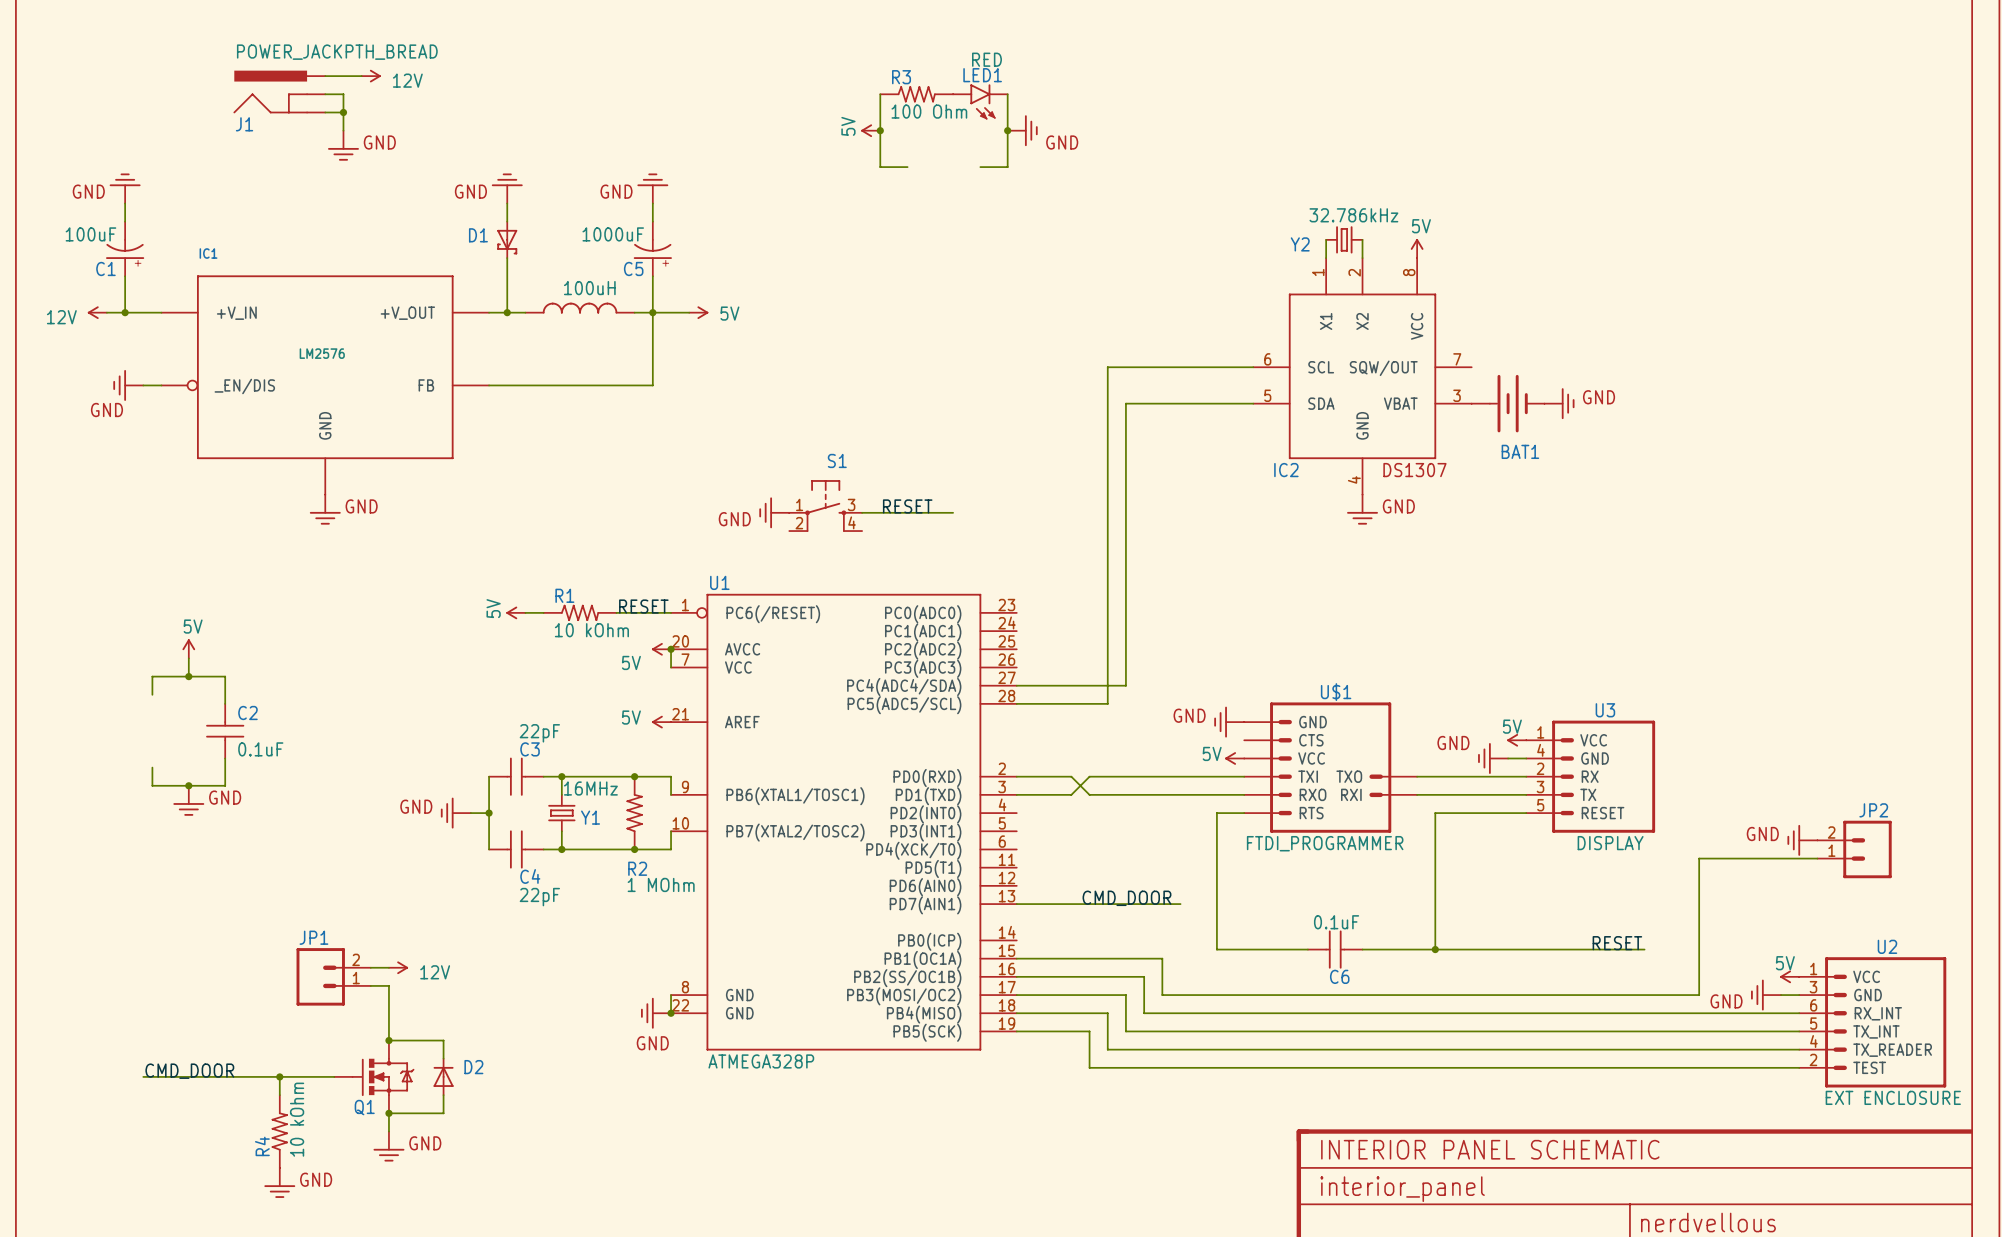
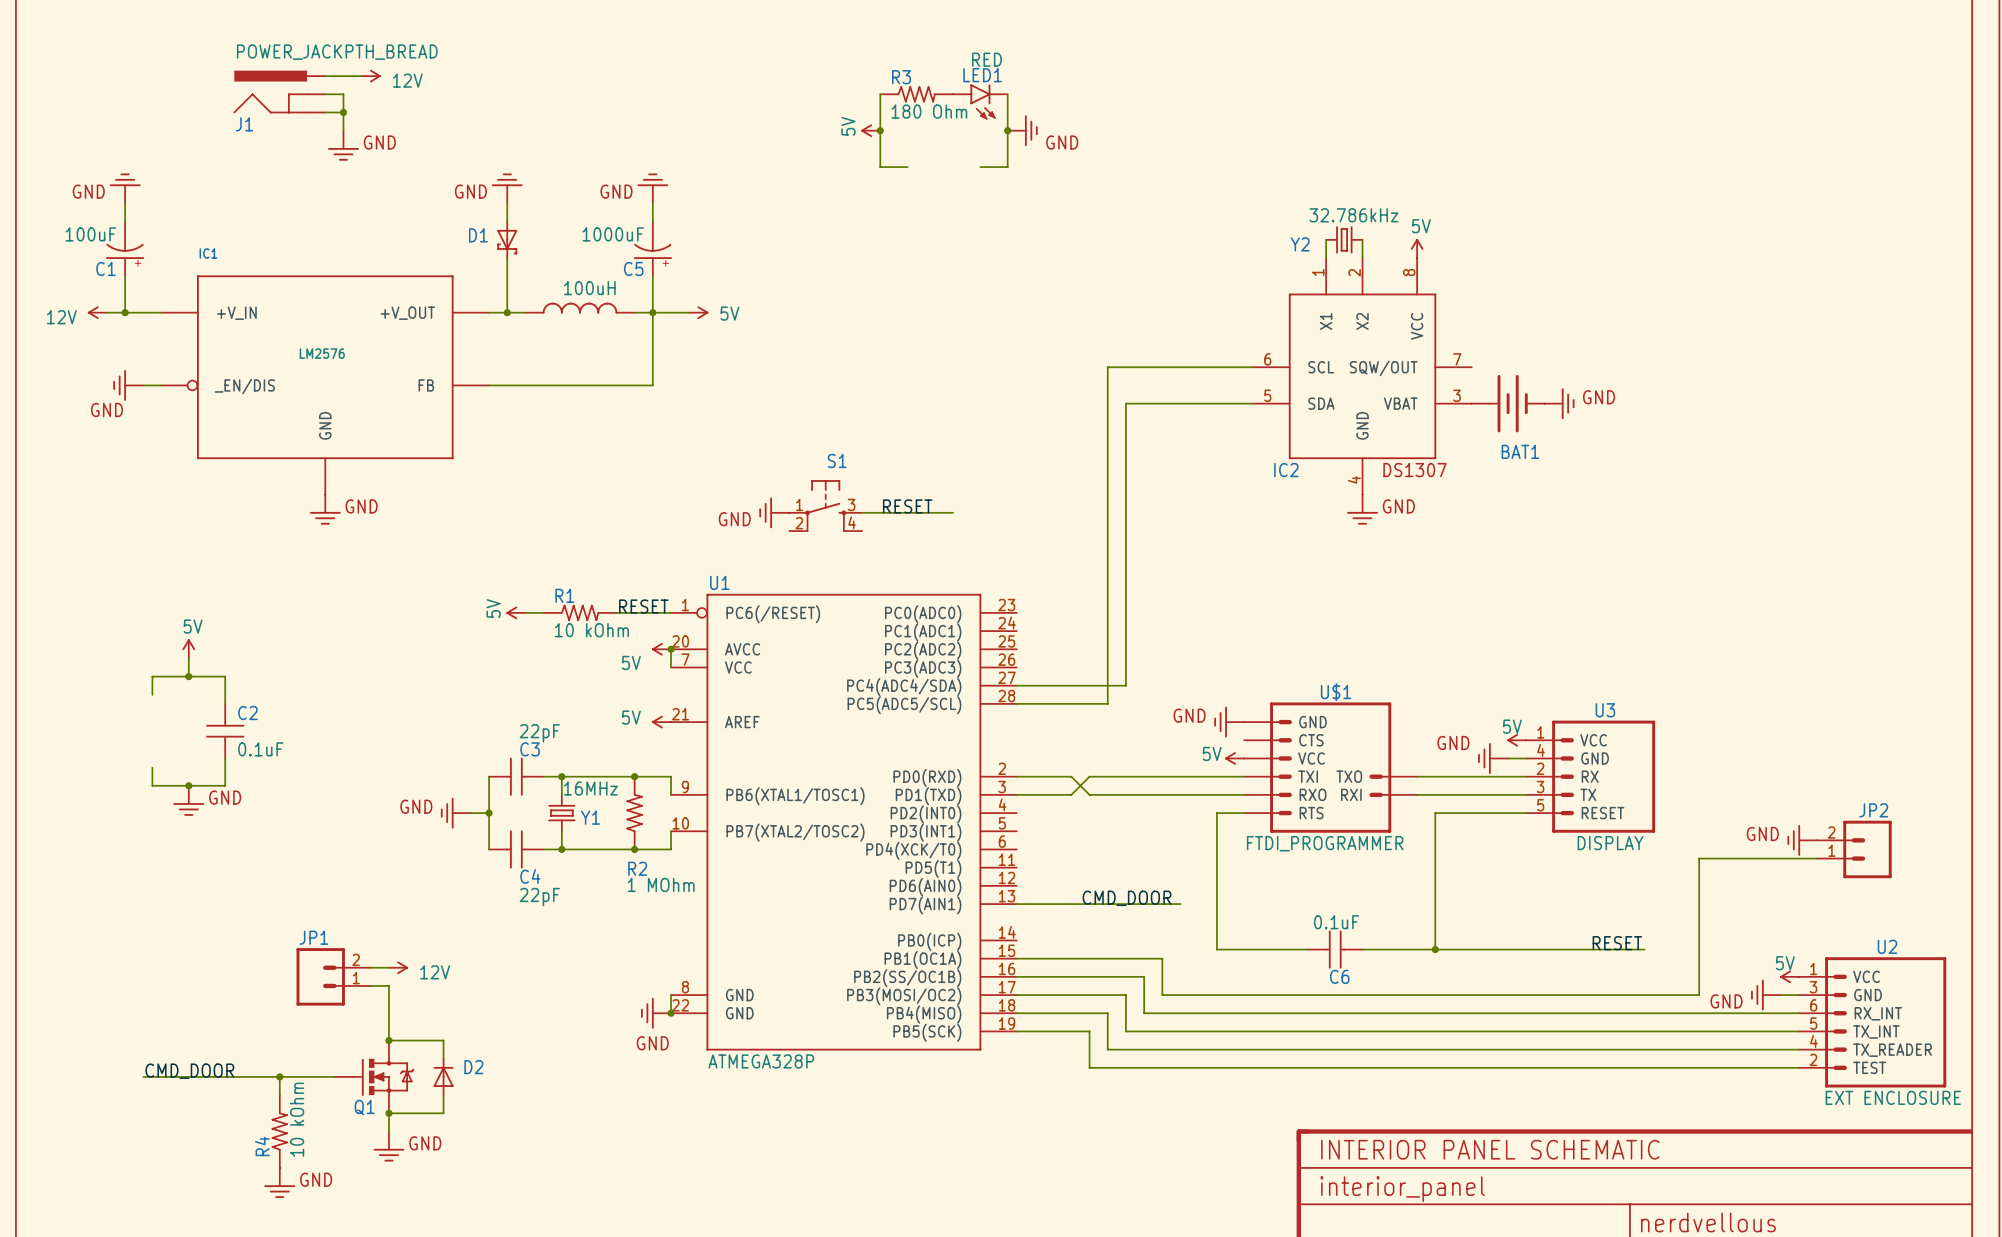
R3 value: 100 Ohm (929, 111) -> 180 Ohm (929, 111)

